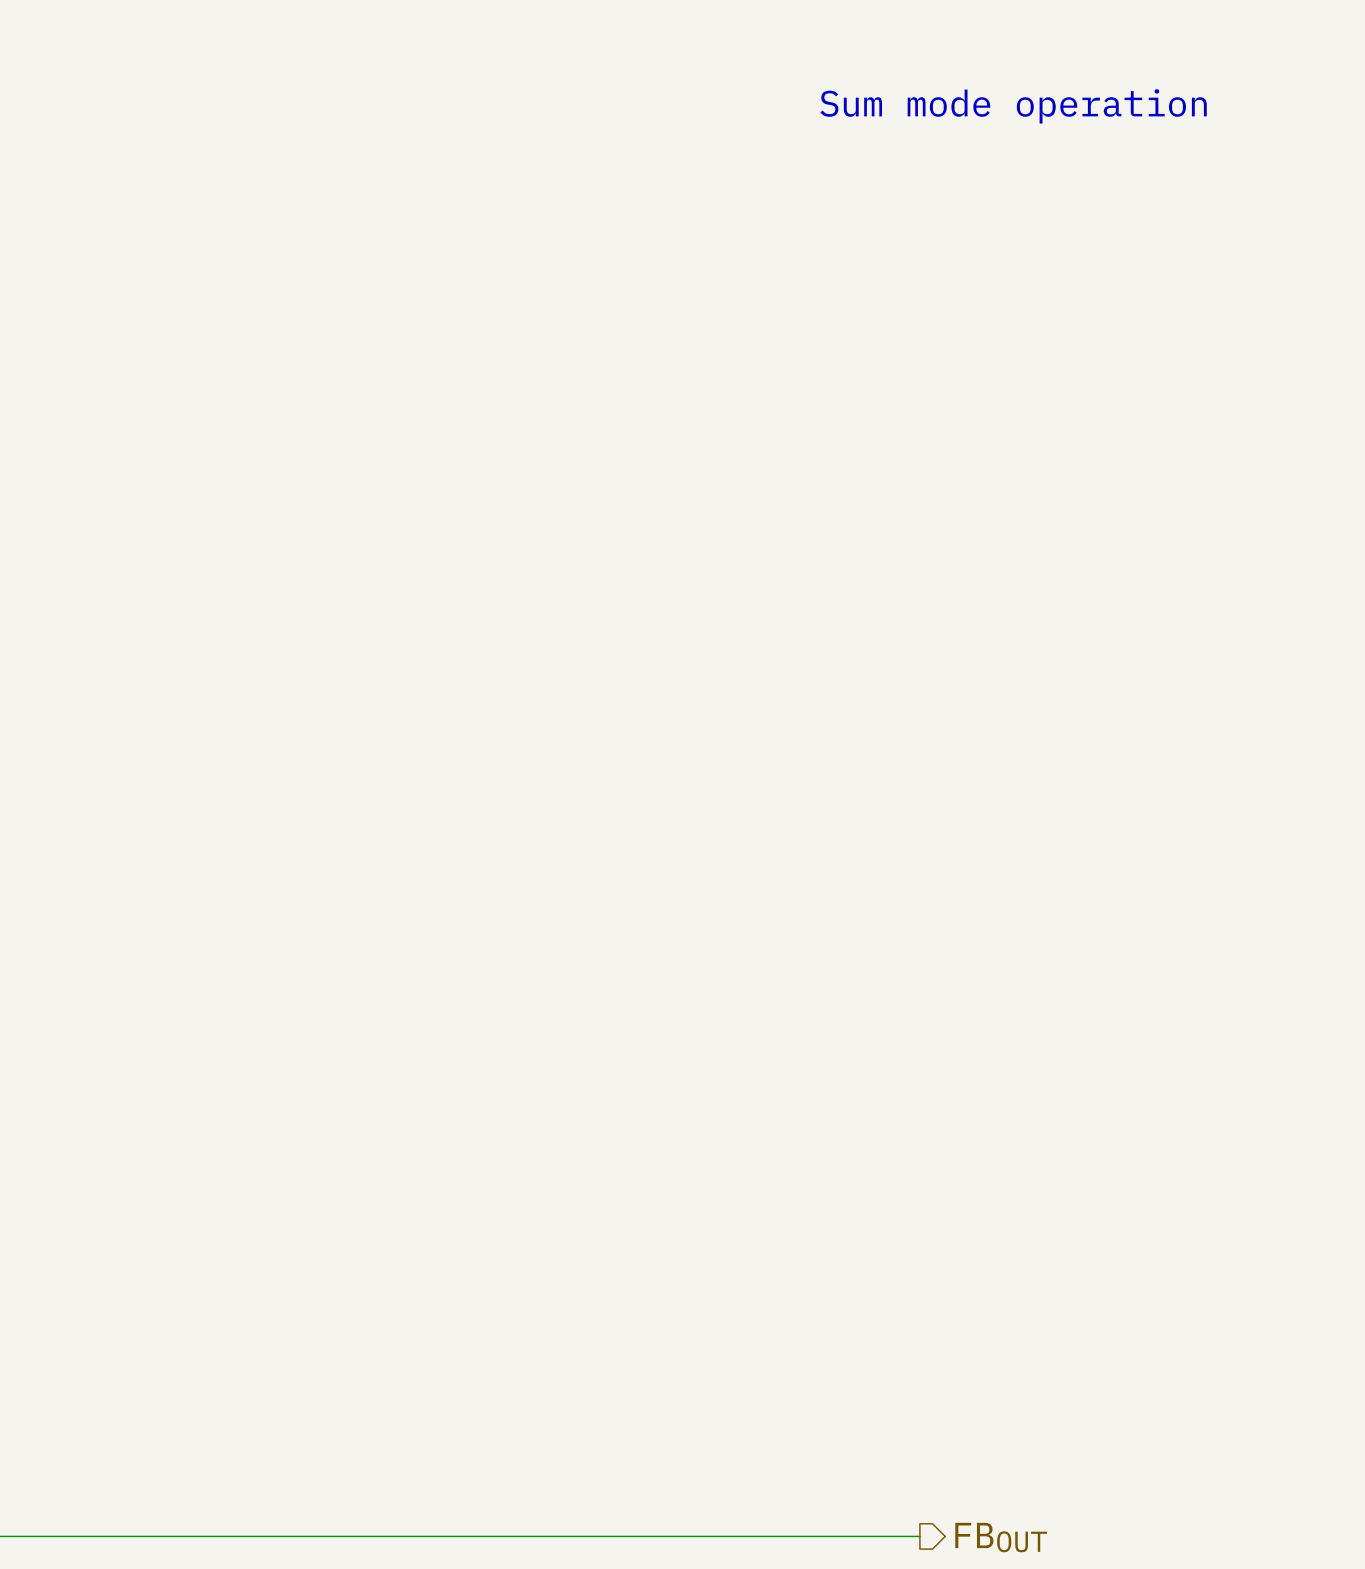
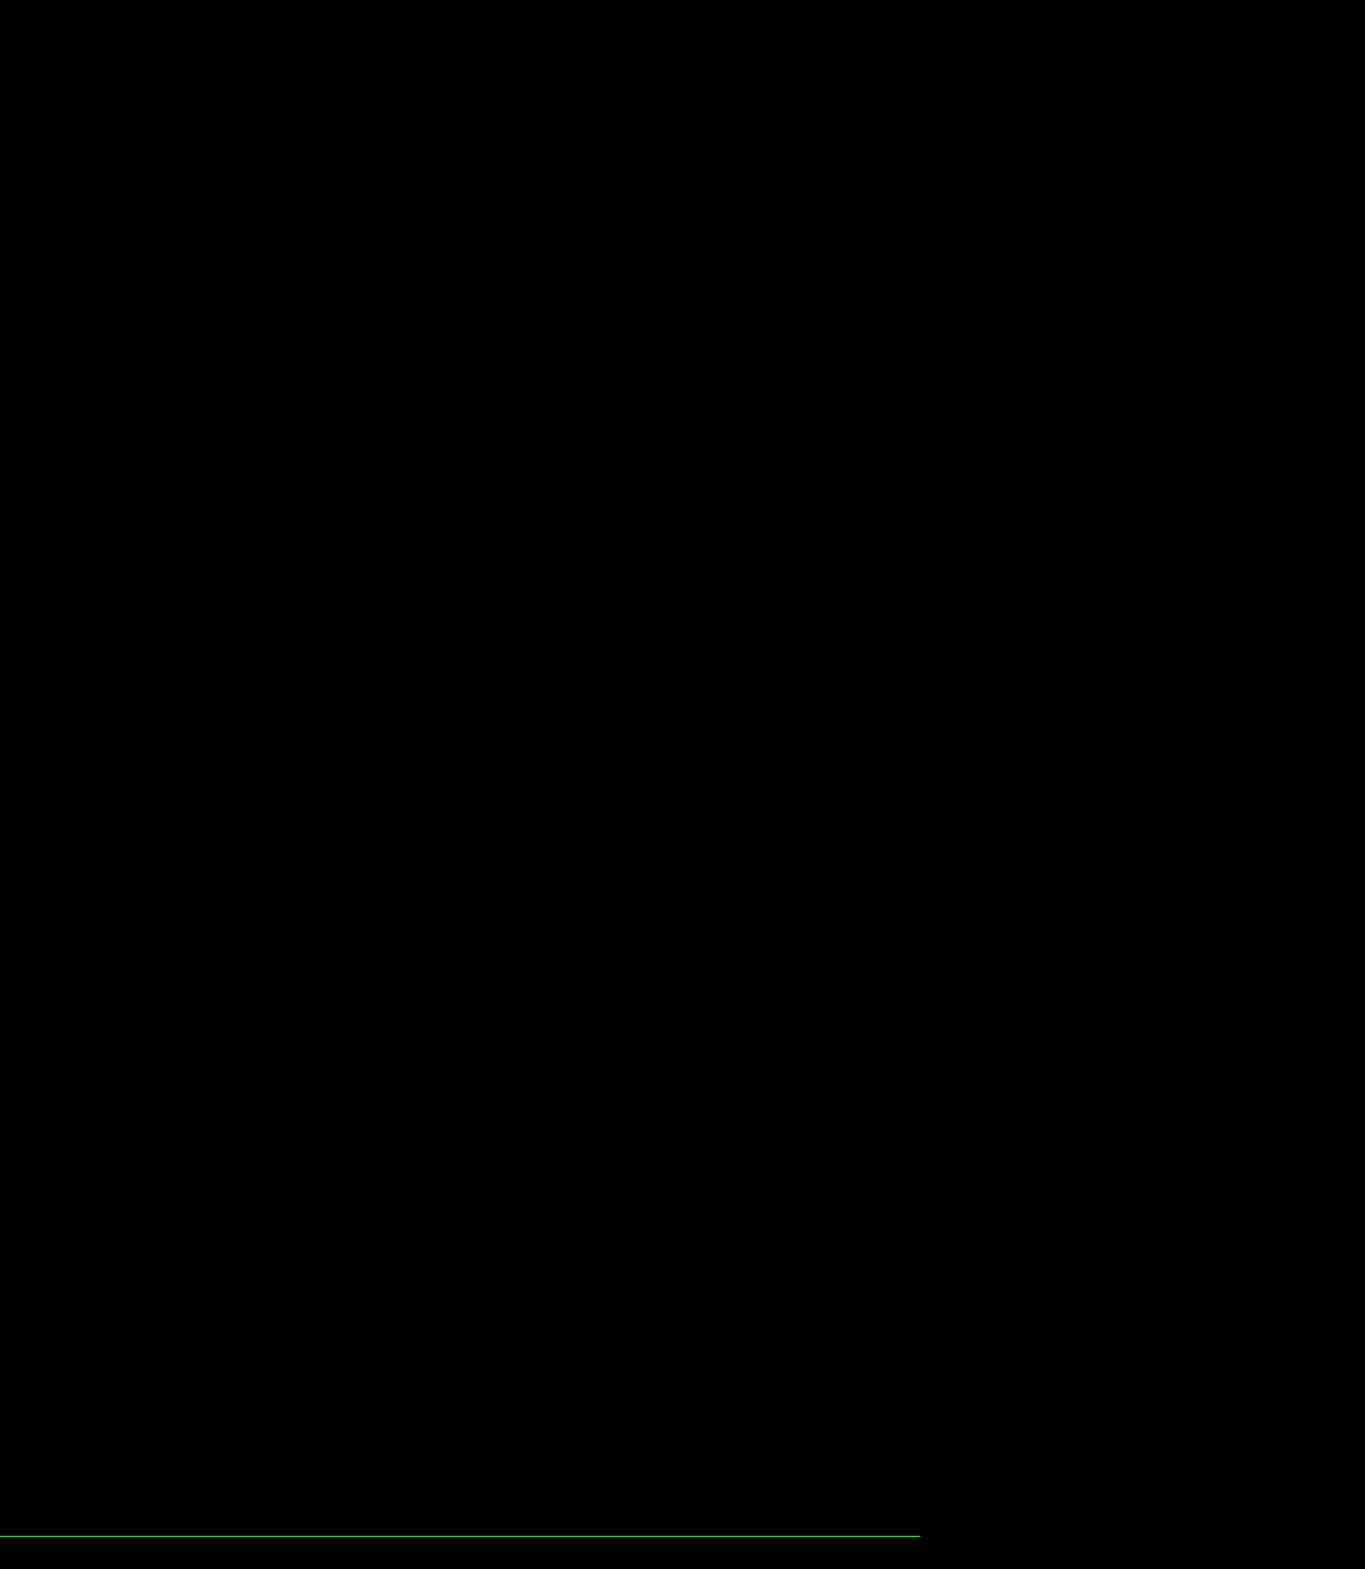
text: Sum mode operation (1013, 106) -> none
hierarchical label: FBOUT (1001, 1537) -> none

